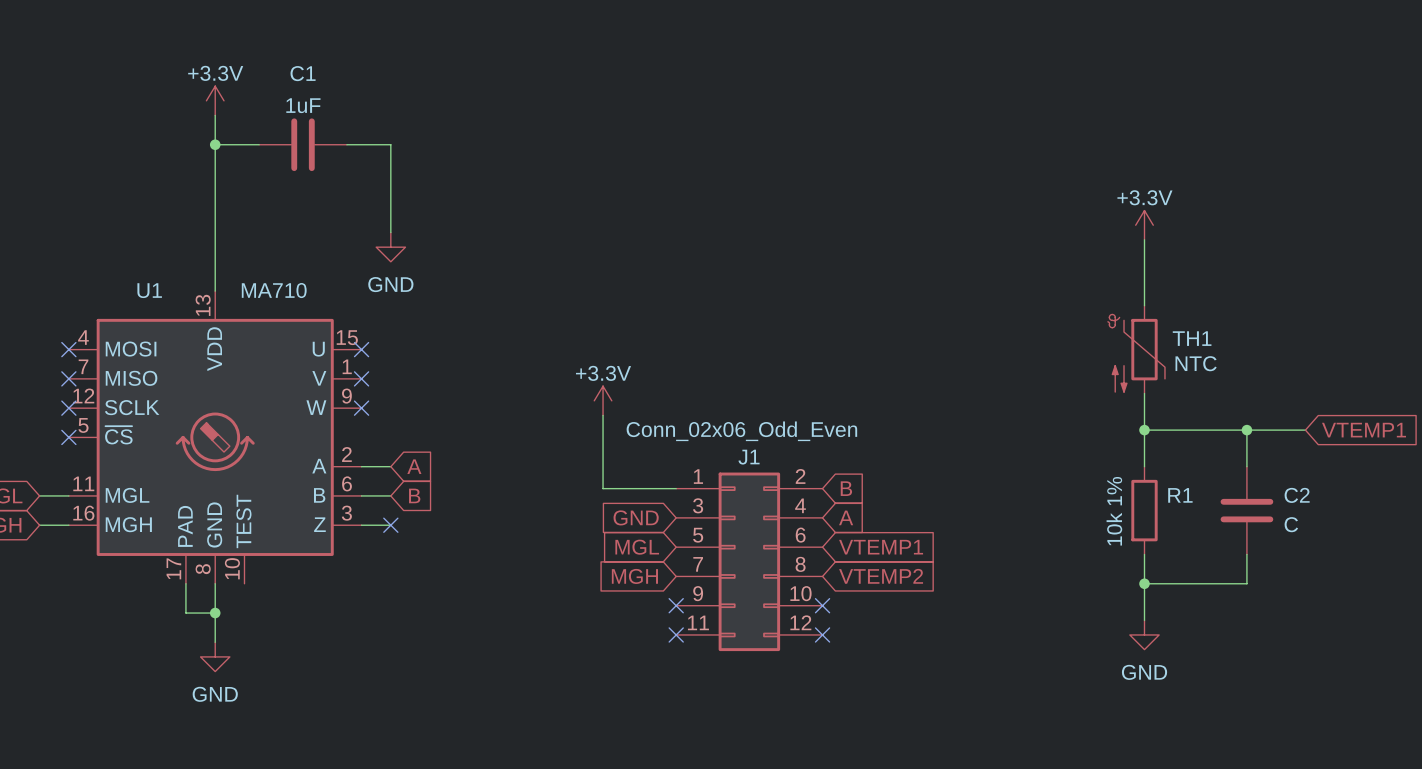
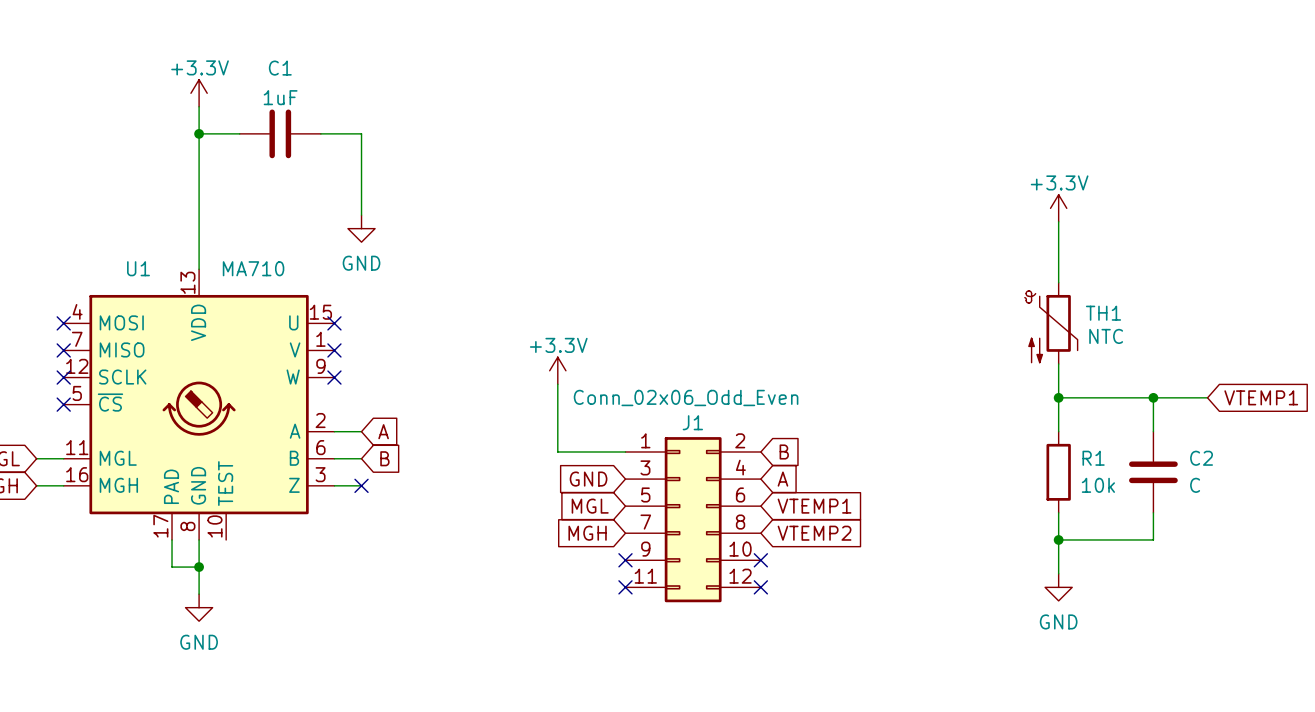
R1 value: 10k 1% (1114, 511) -> 10k (1098, 485)

